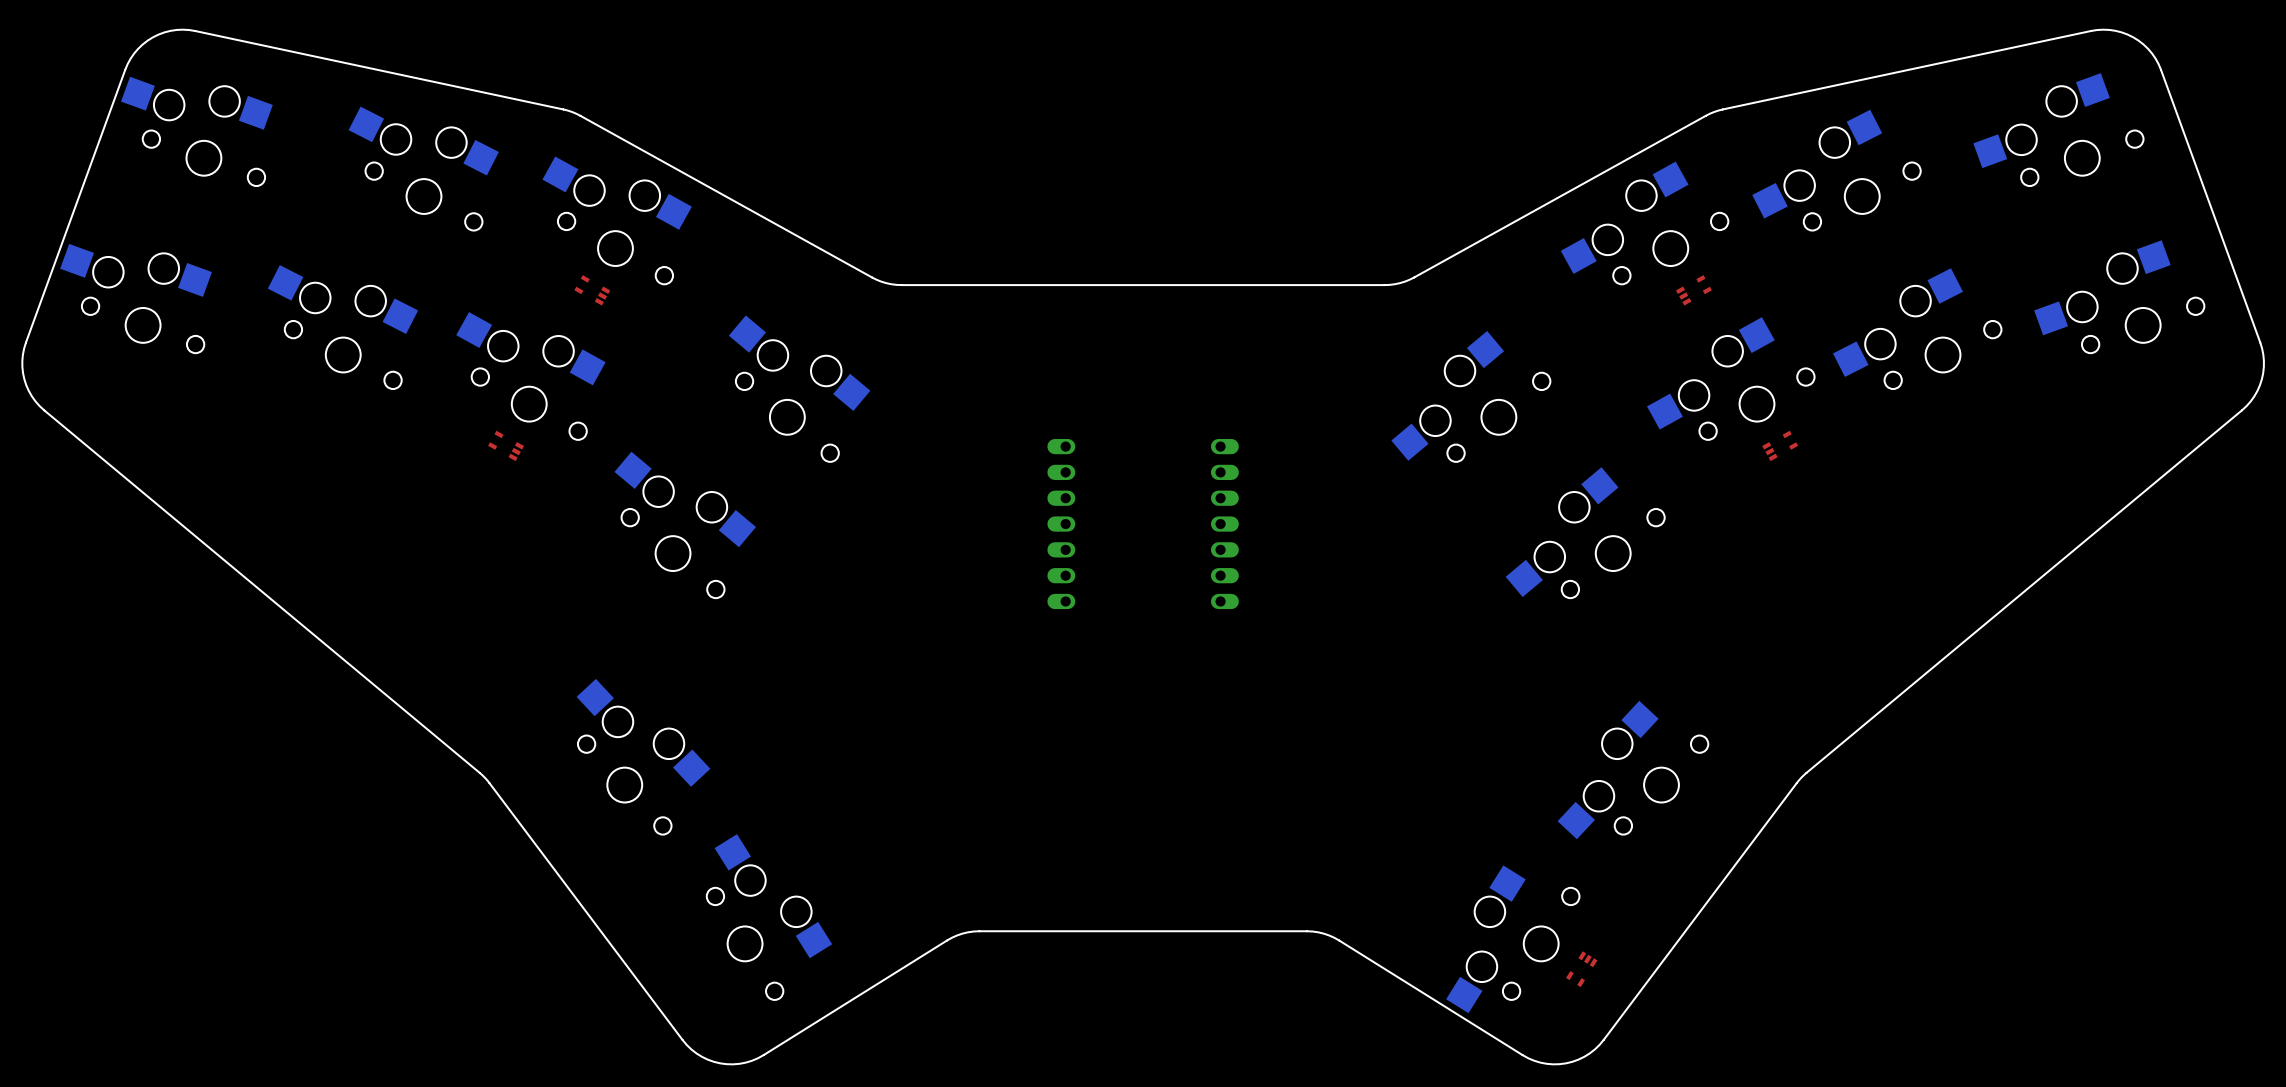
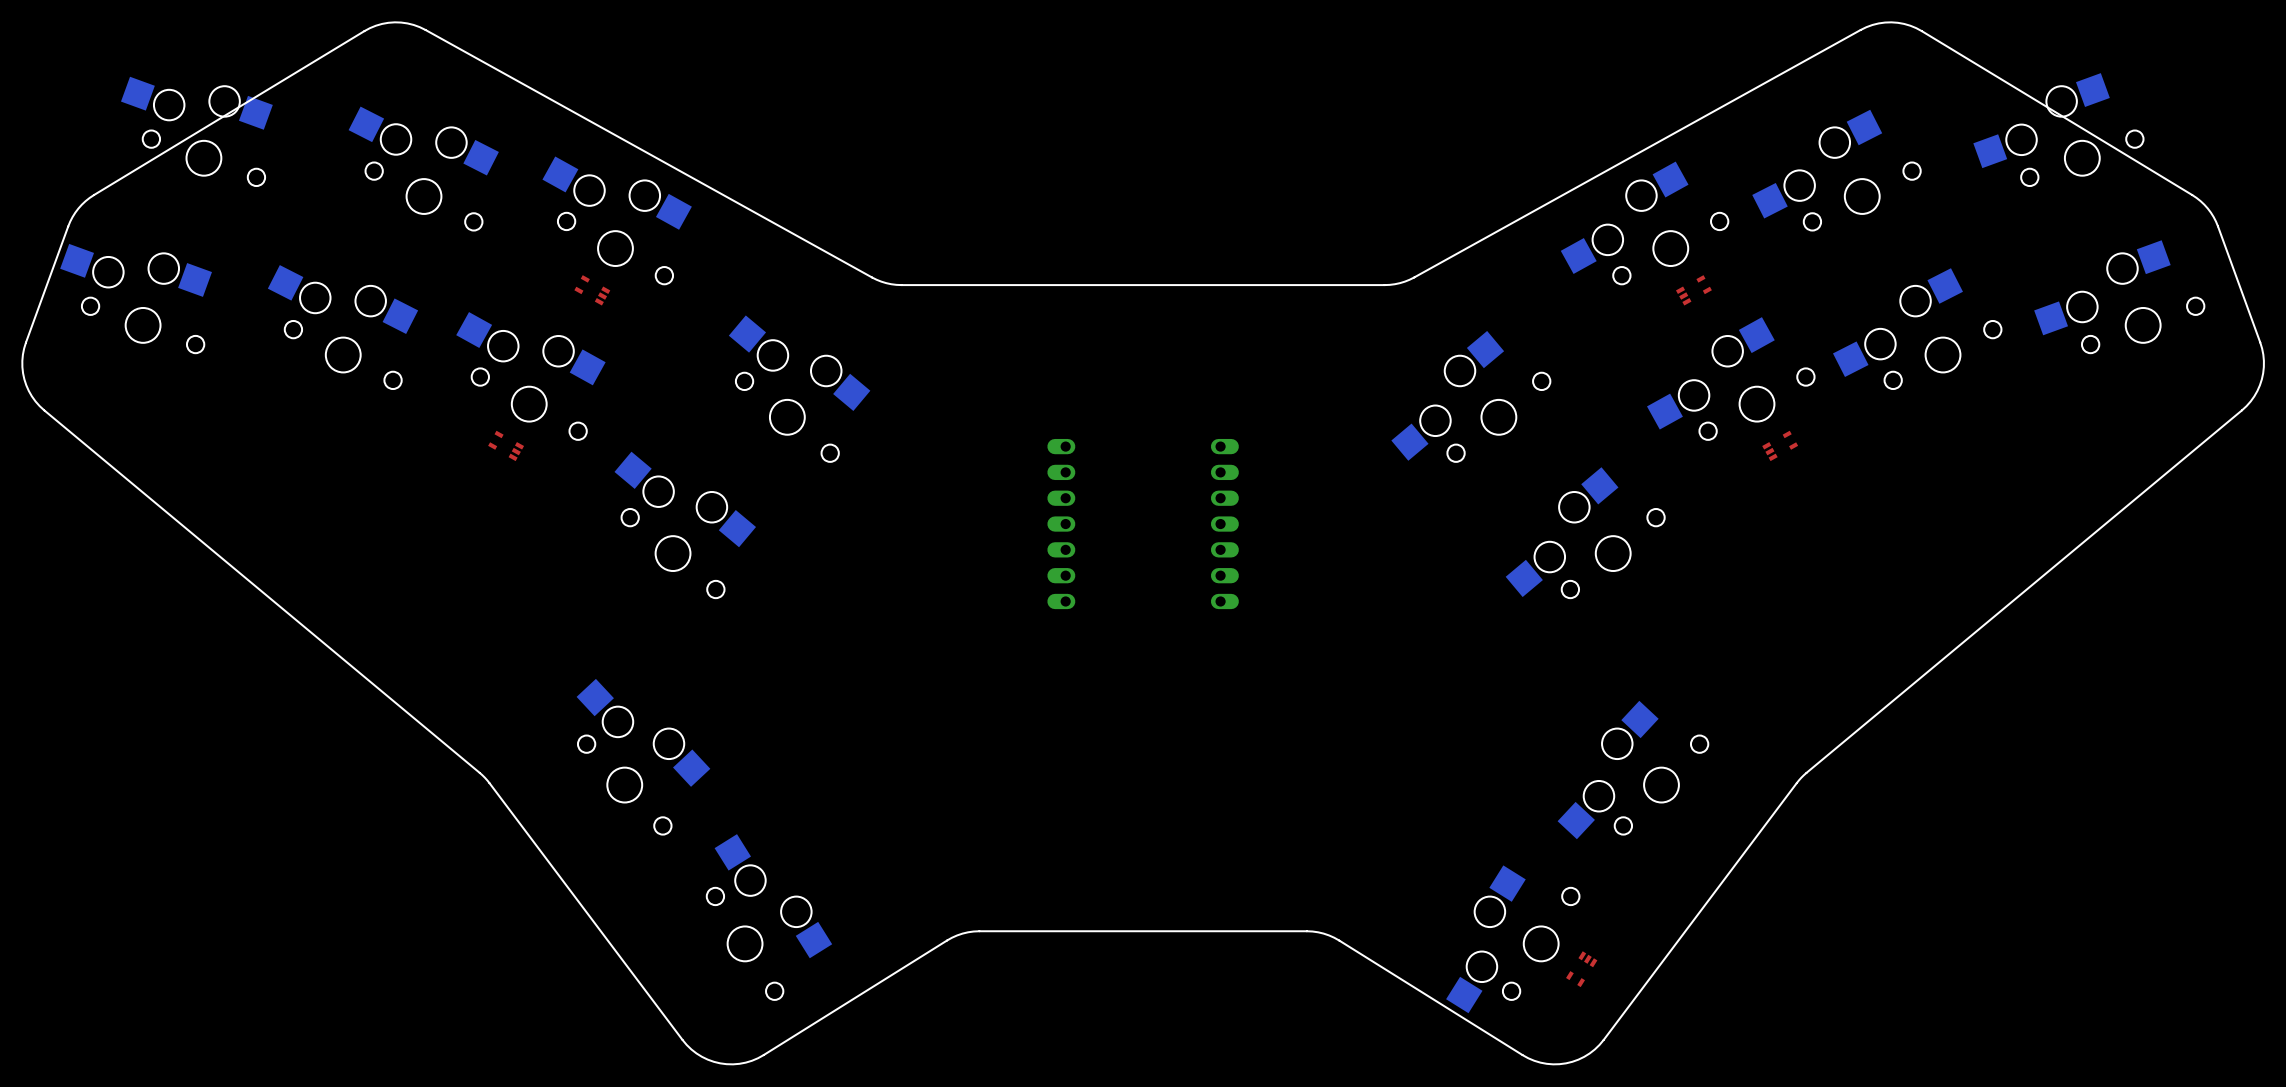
board edge: (580, 115) (563, 109) (195, 31) (170, 30) (158, 34) (142, 44) (127, 64) (68, 226) -> (580, 115) (419, 27) (401, 22) (382, 23) (364, 31) (93, 195) (78, 208) (68, 226)
board edge: (1705, 115) (1722, 109) (2090, 31) (2115, 30) (2127, 34) (2143, 44) (2158, 64) (2217, 226) -> (1705, 115) (1866, 27) (1885, 22) (1904, 23) (1921, 31) (2192, 195) (2207, 208) (2217, 226)

